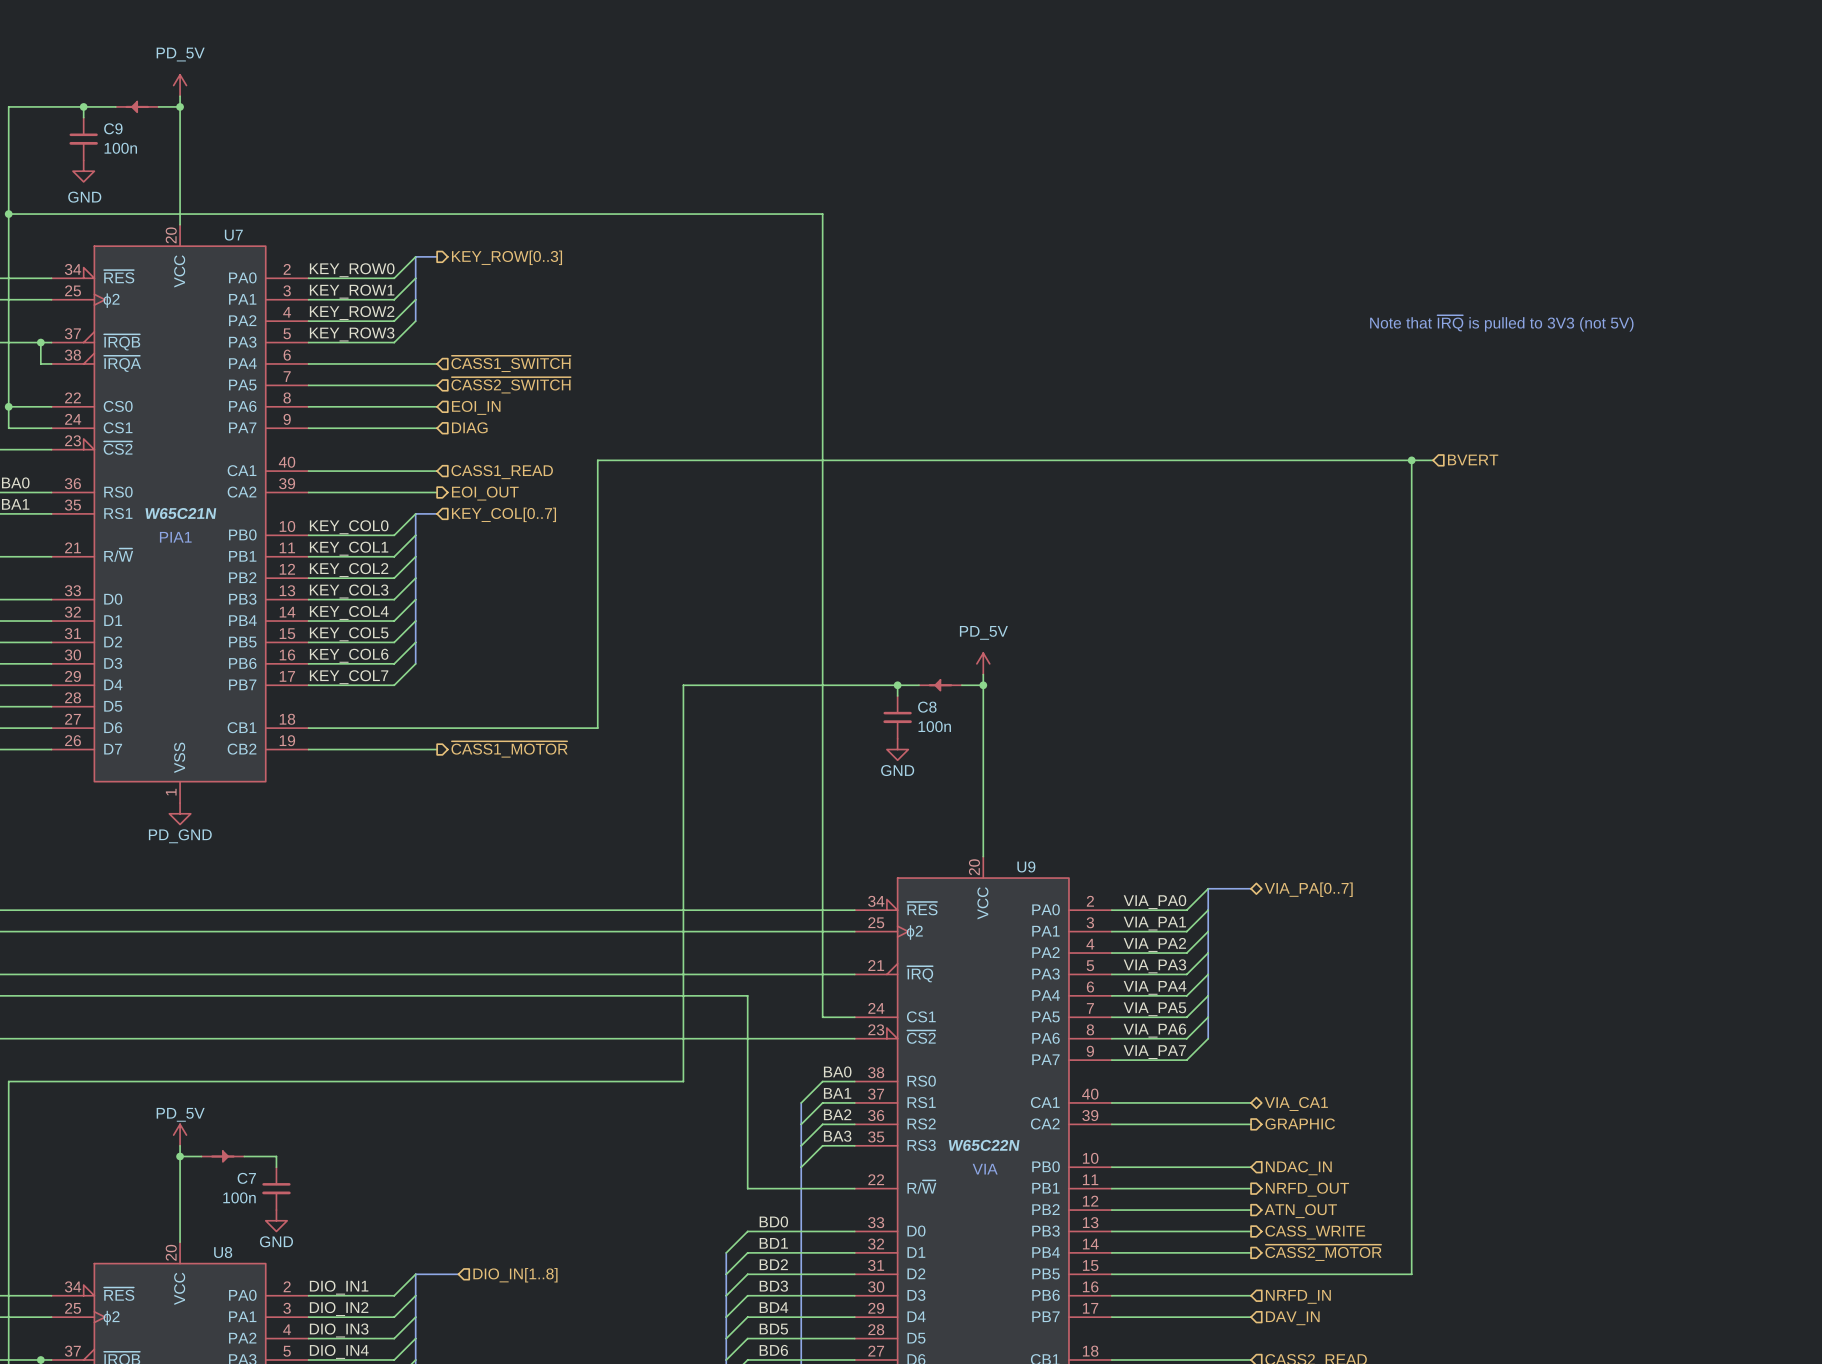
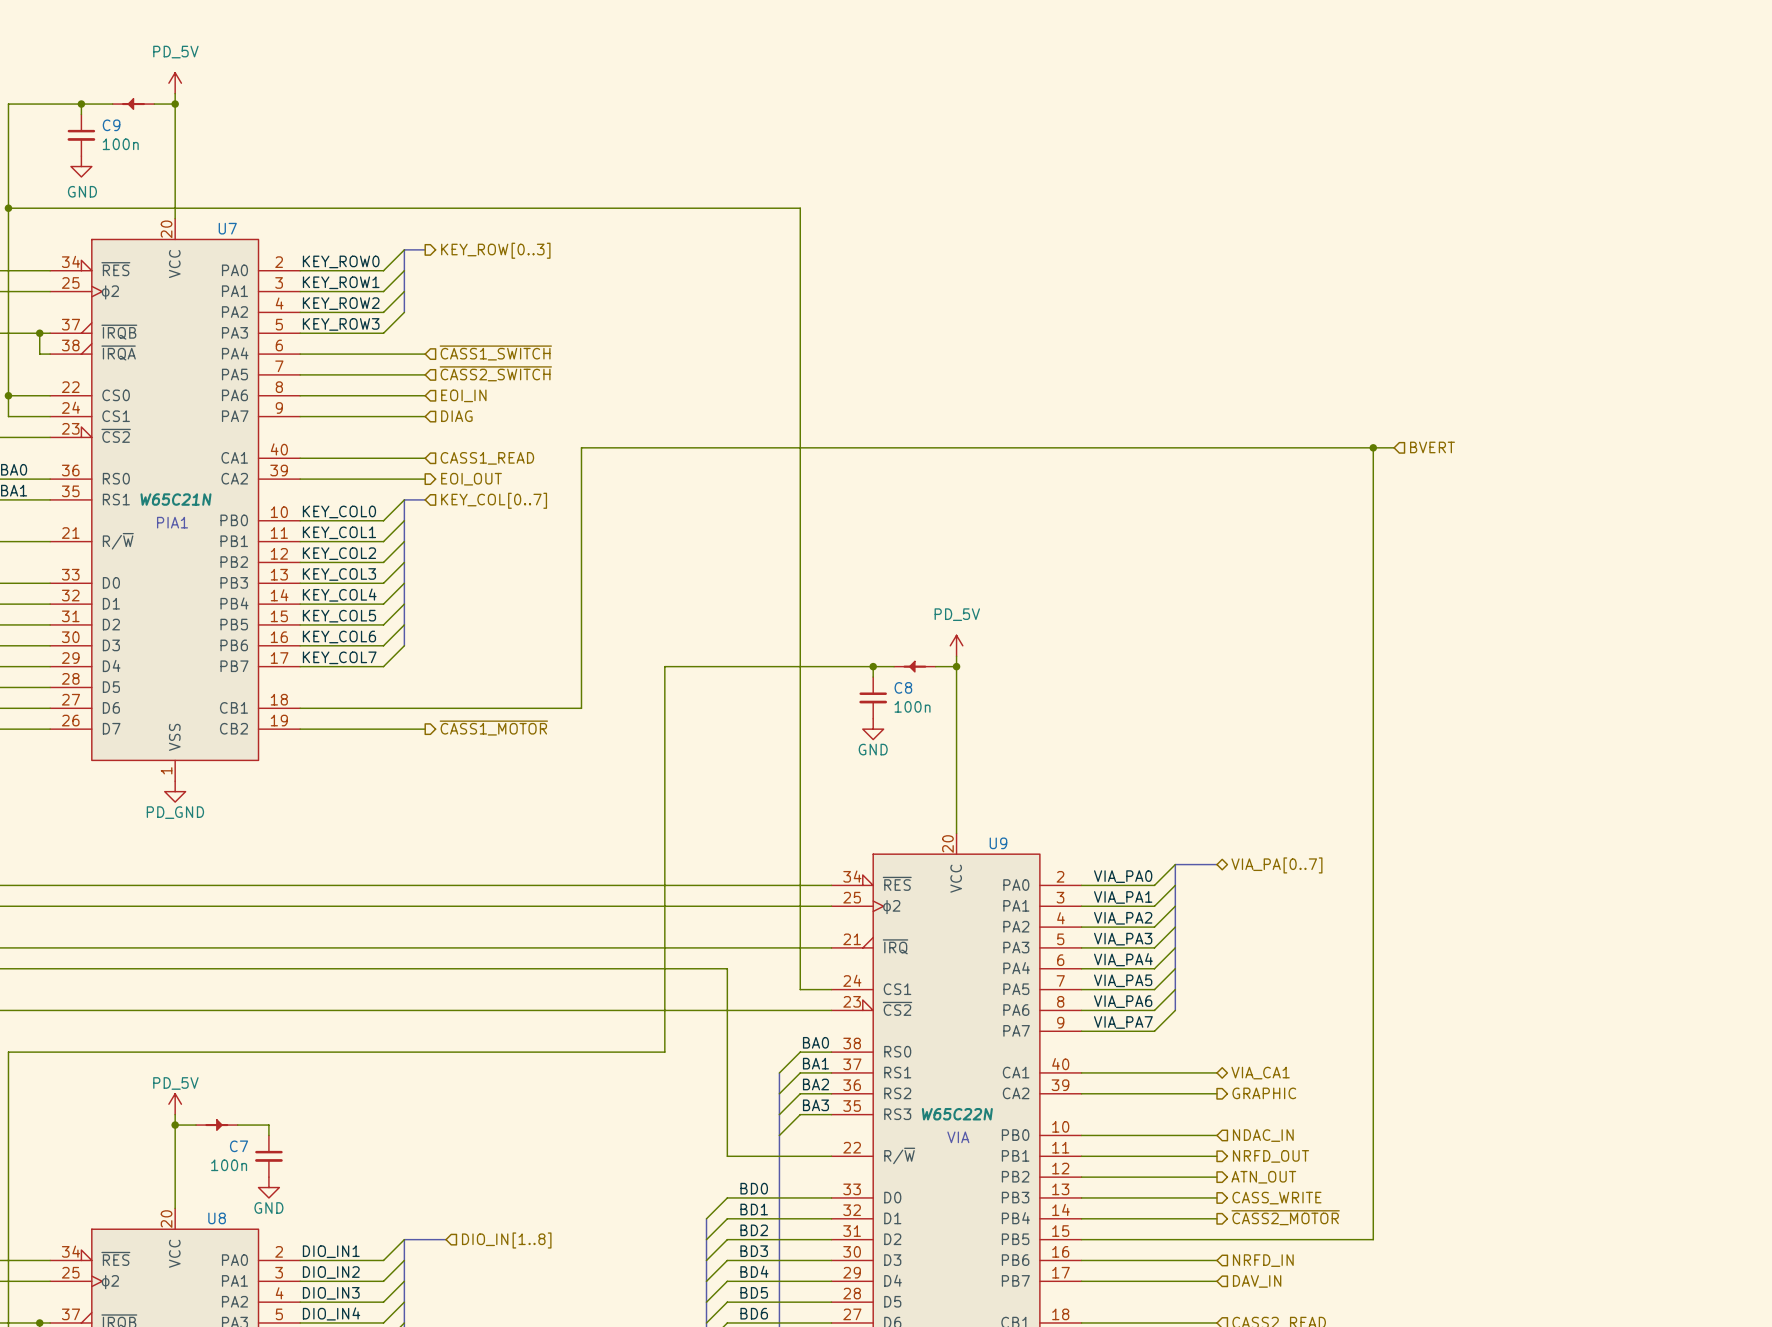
text: Note that ~{IRQ} is pulled to 3V3 (not 5V) (1501, 323) -> none

